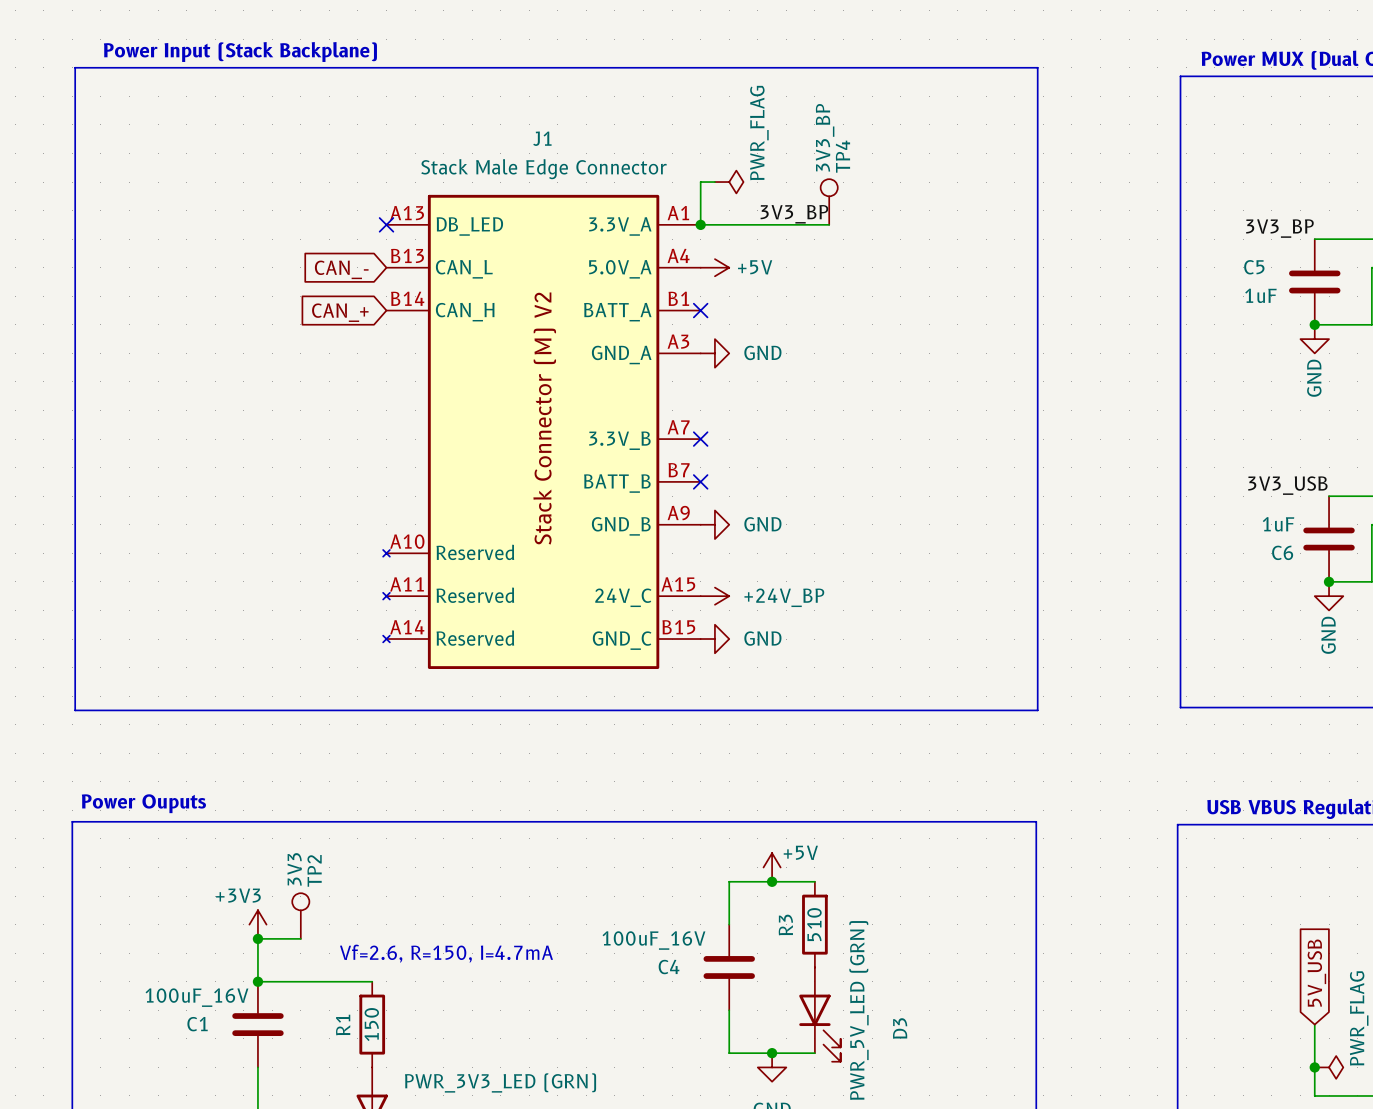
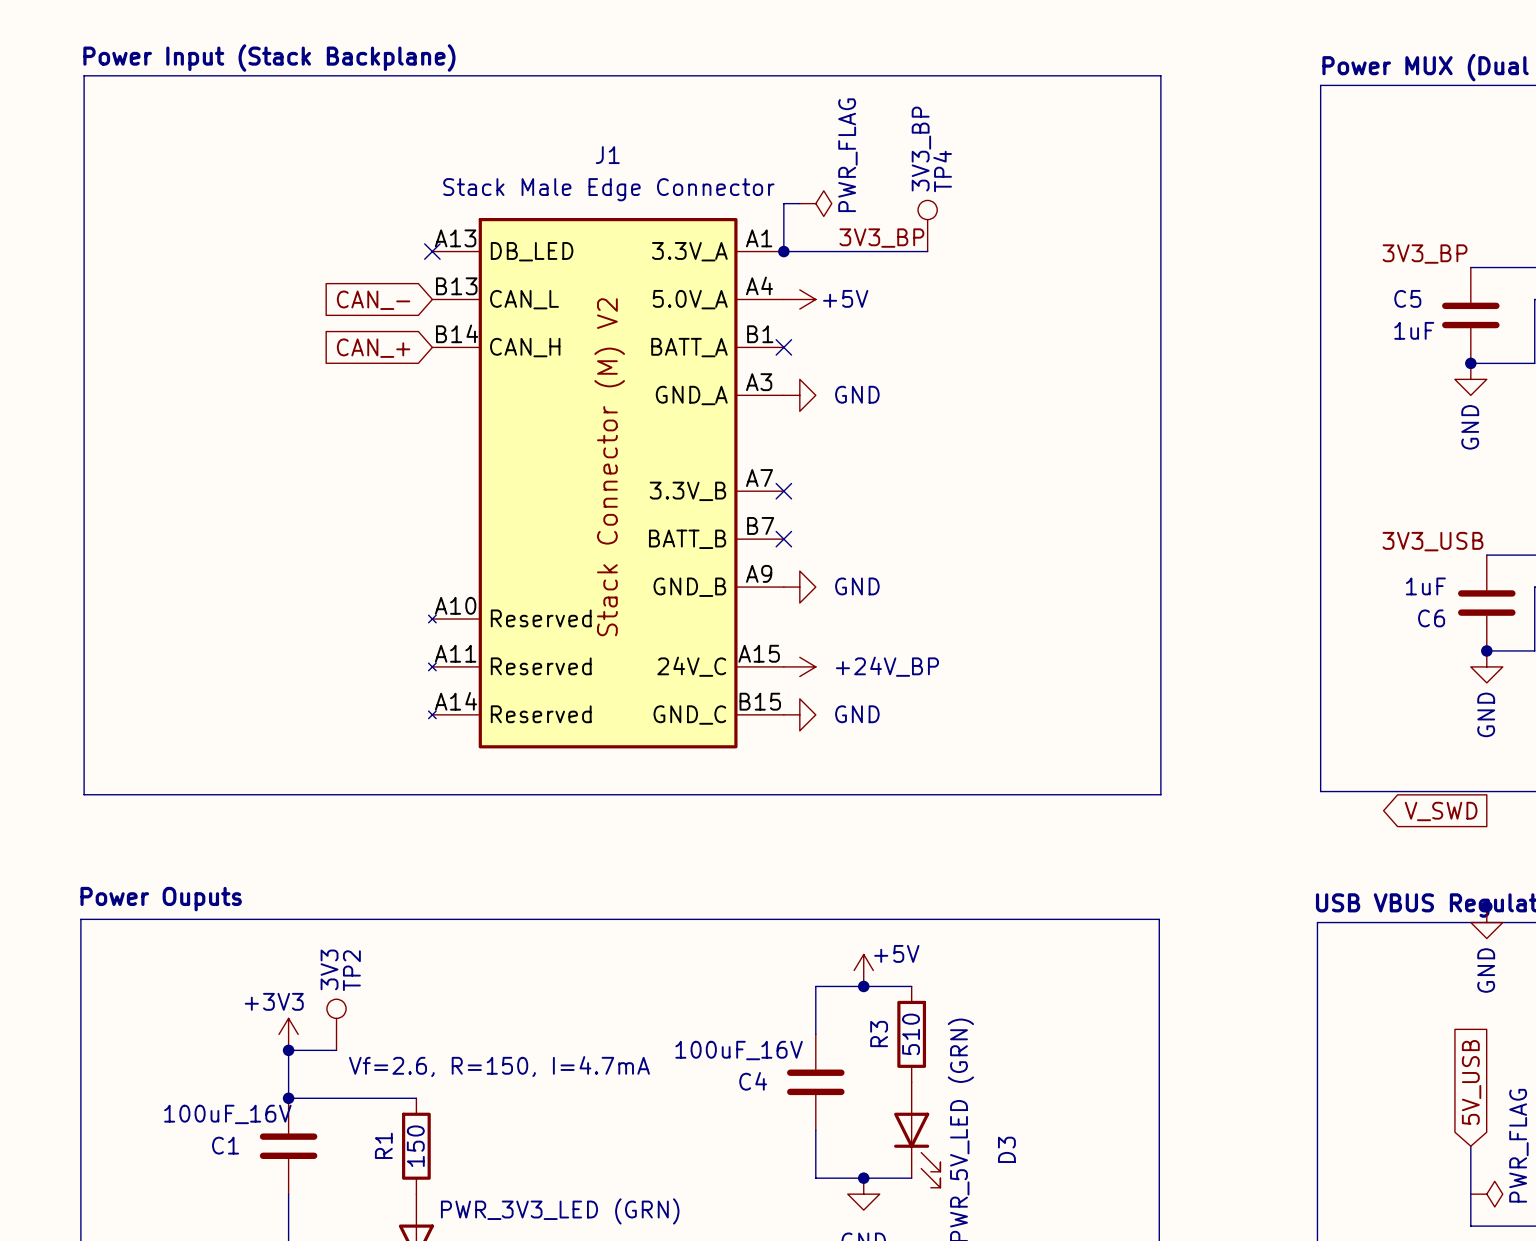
global label: none -> V_SWD (1441, 811)
junction: none -> (1486, 906)
power symbol: none -> GND (1486, 922)
junction: (1314, 1067) -> none

